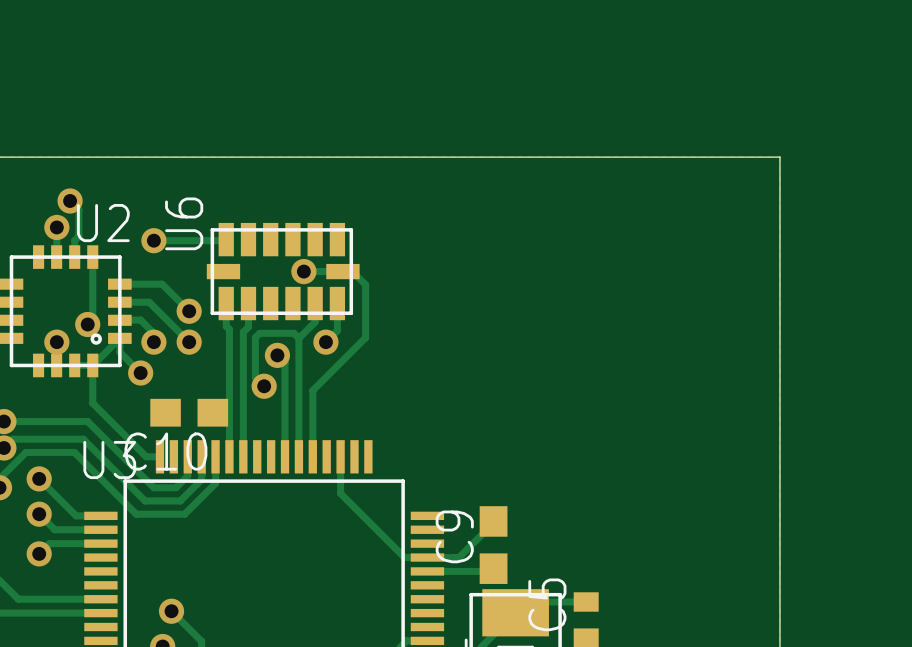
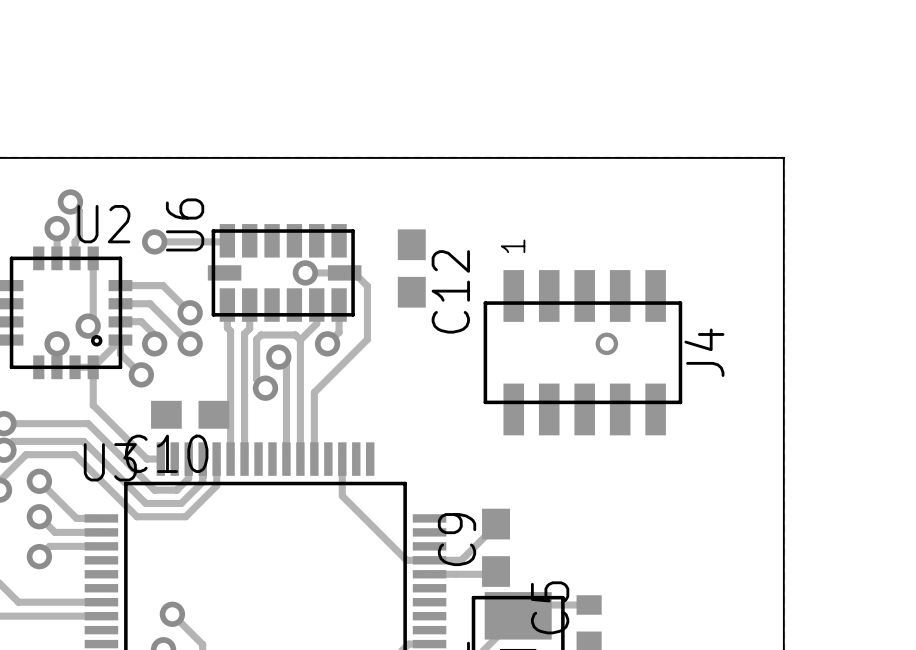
C12: none -> (411, 268)
via: none -> (606, 343)
J4: none -> (582, 352)

